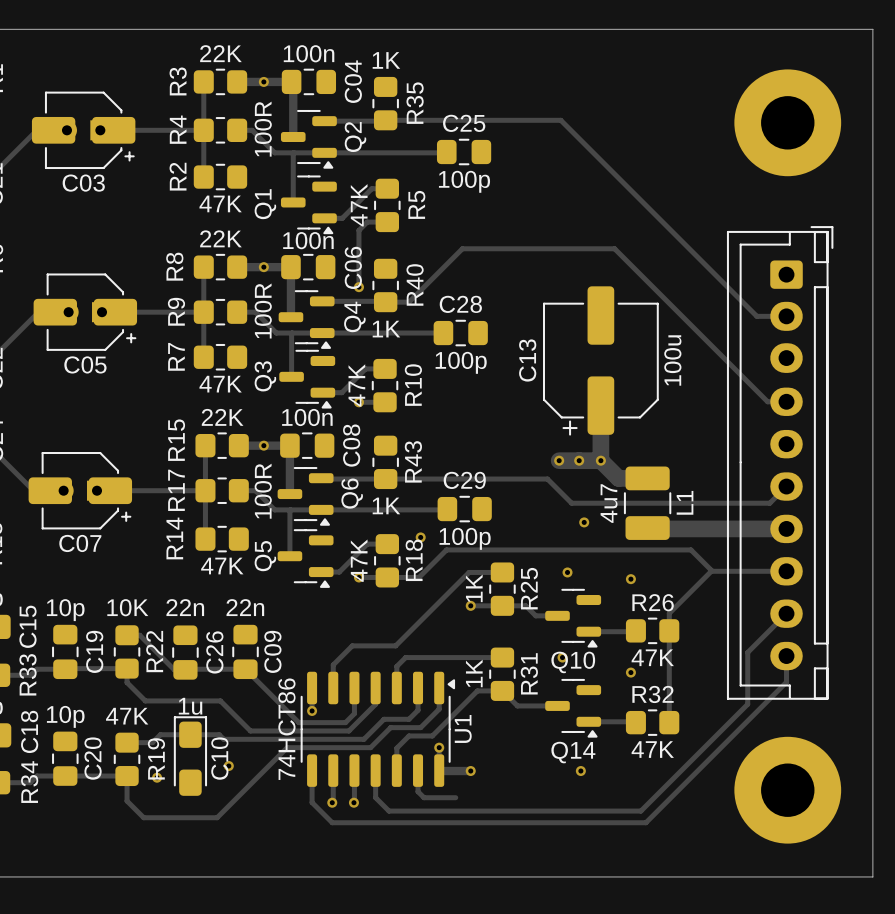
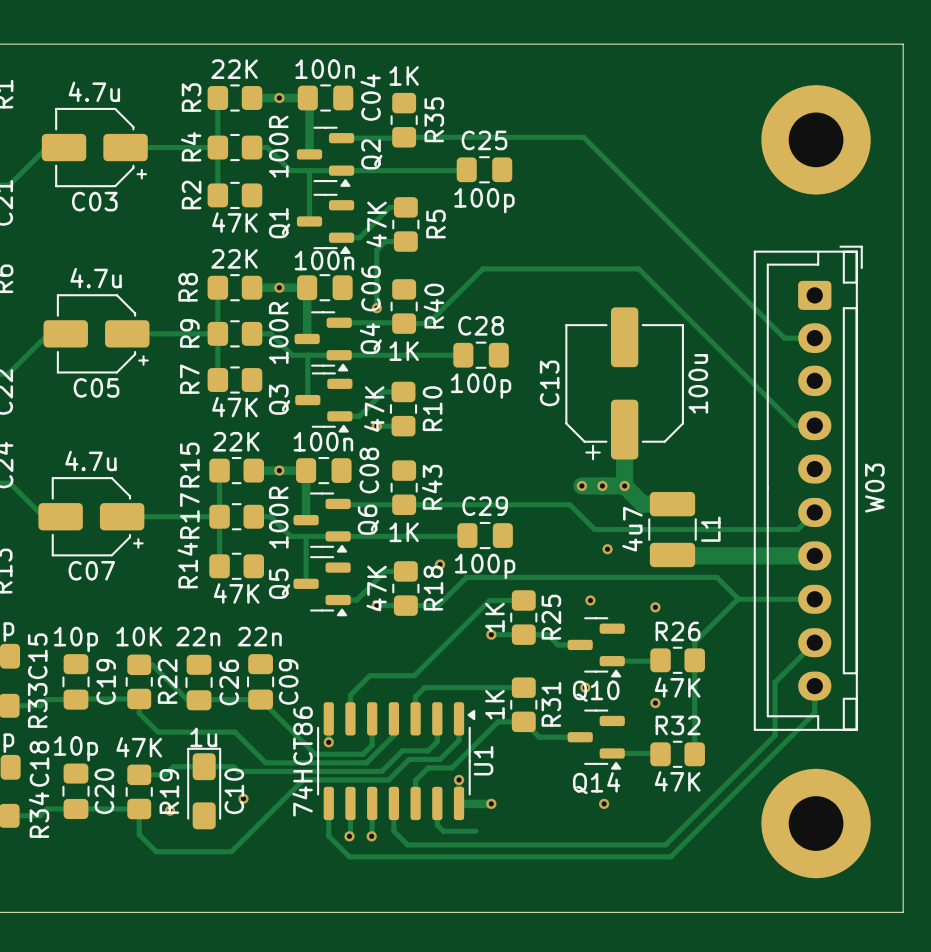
C03 value: none -> 4.7u (94, 91)
C03 footprint: [31, 91, 136, 170] -> [41, 107, 148, 188]
C05 value: none -> 4.7u (96, 278)
C05 footprint: [33, 273, 138, 351] -> [43, 294, 150, 374]
C07 value: none -> 4.7u (90, 460)
C07 footprint: [28, 452, 133, 530] -> [38, 477, 145, 557]
W03 name: none -> W03 (874, 488)

